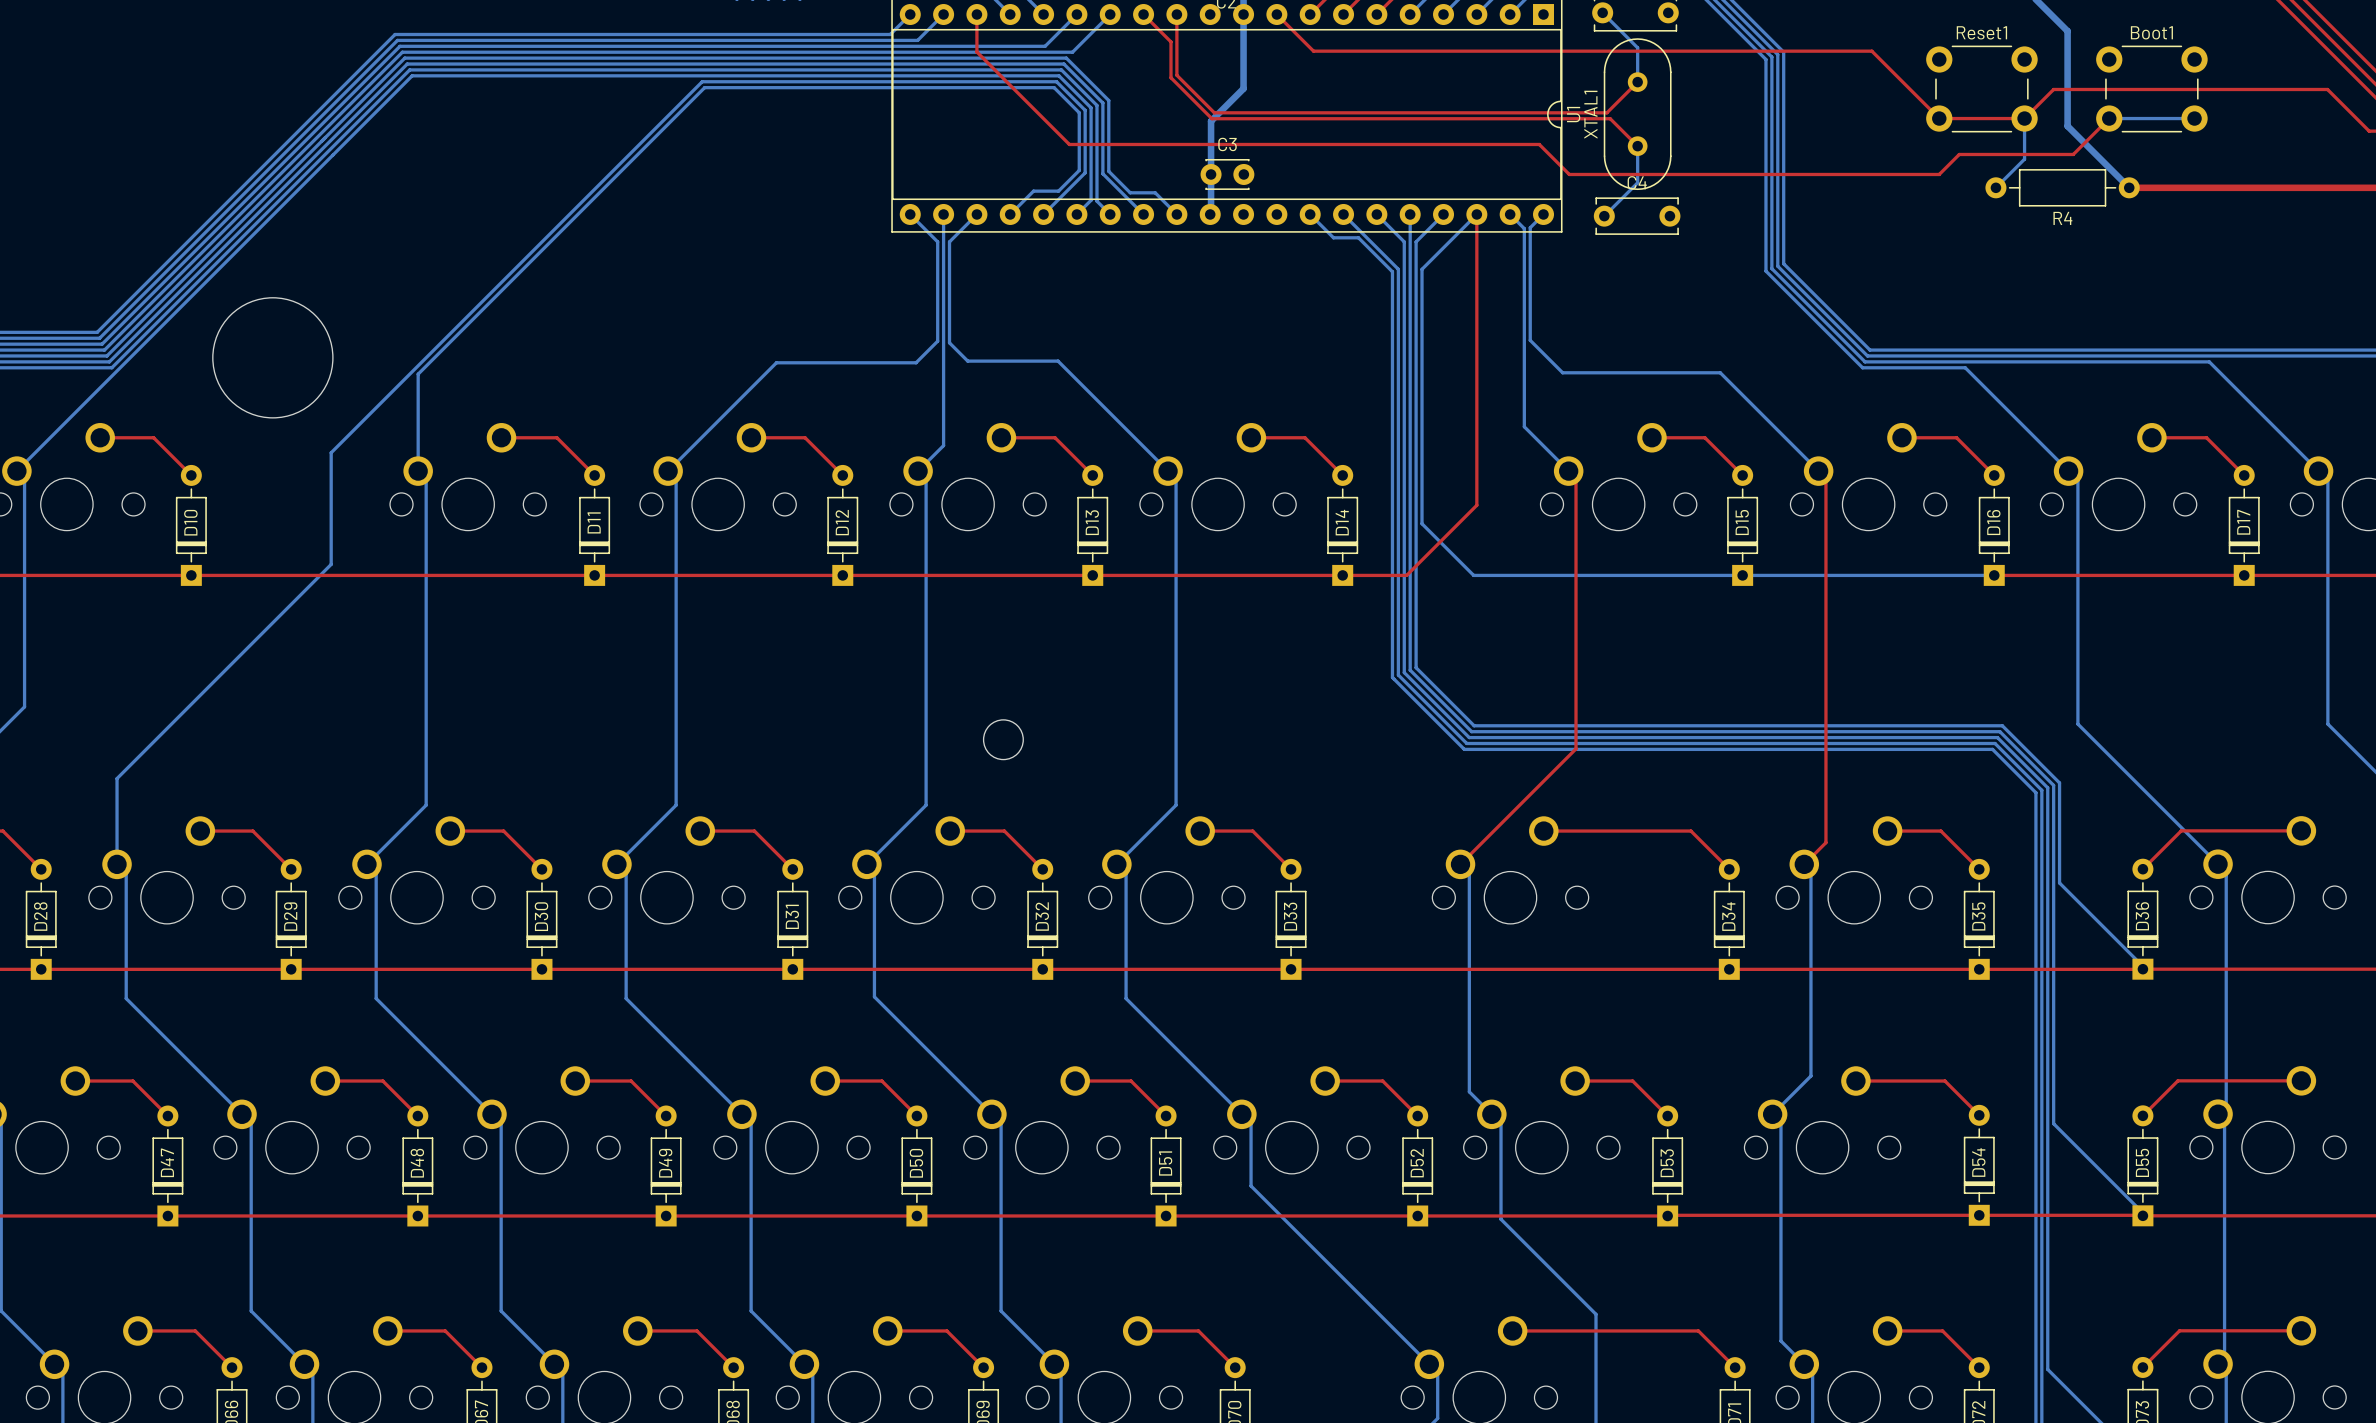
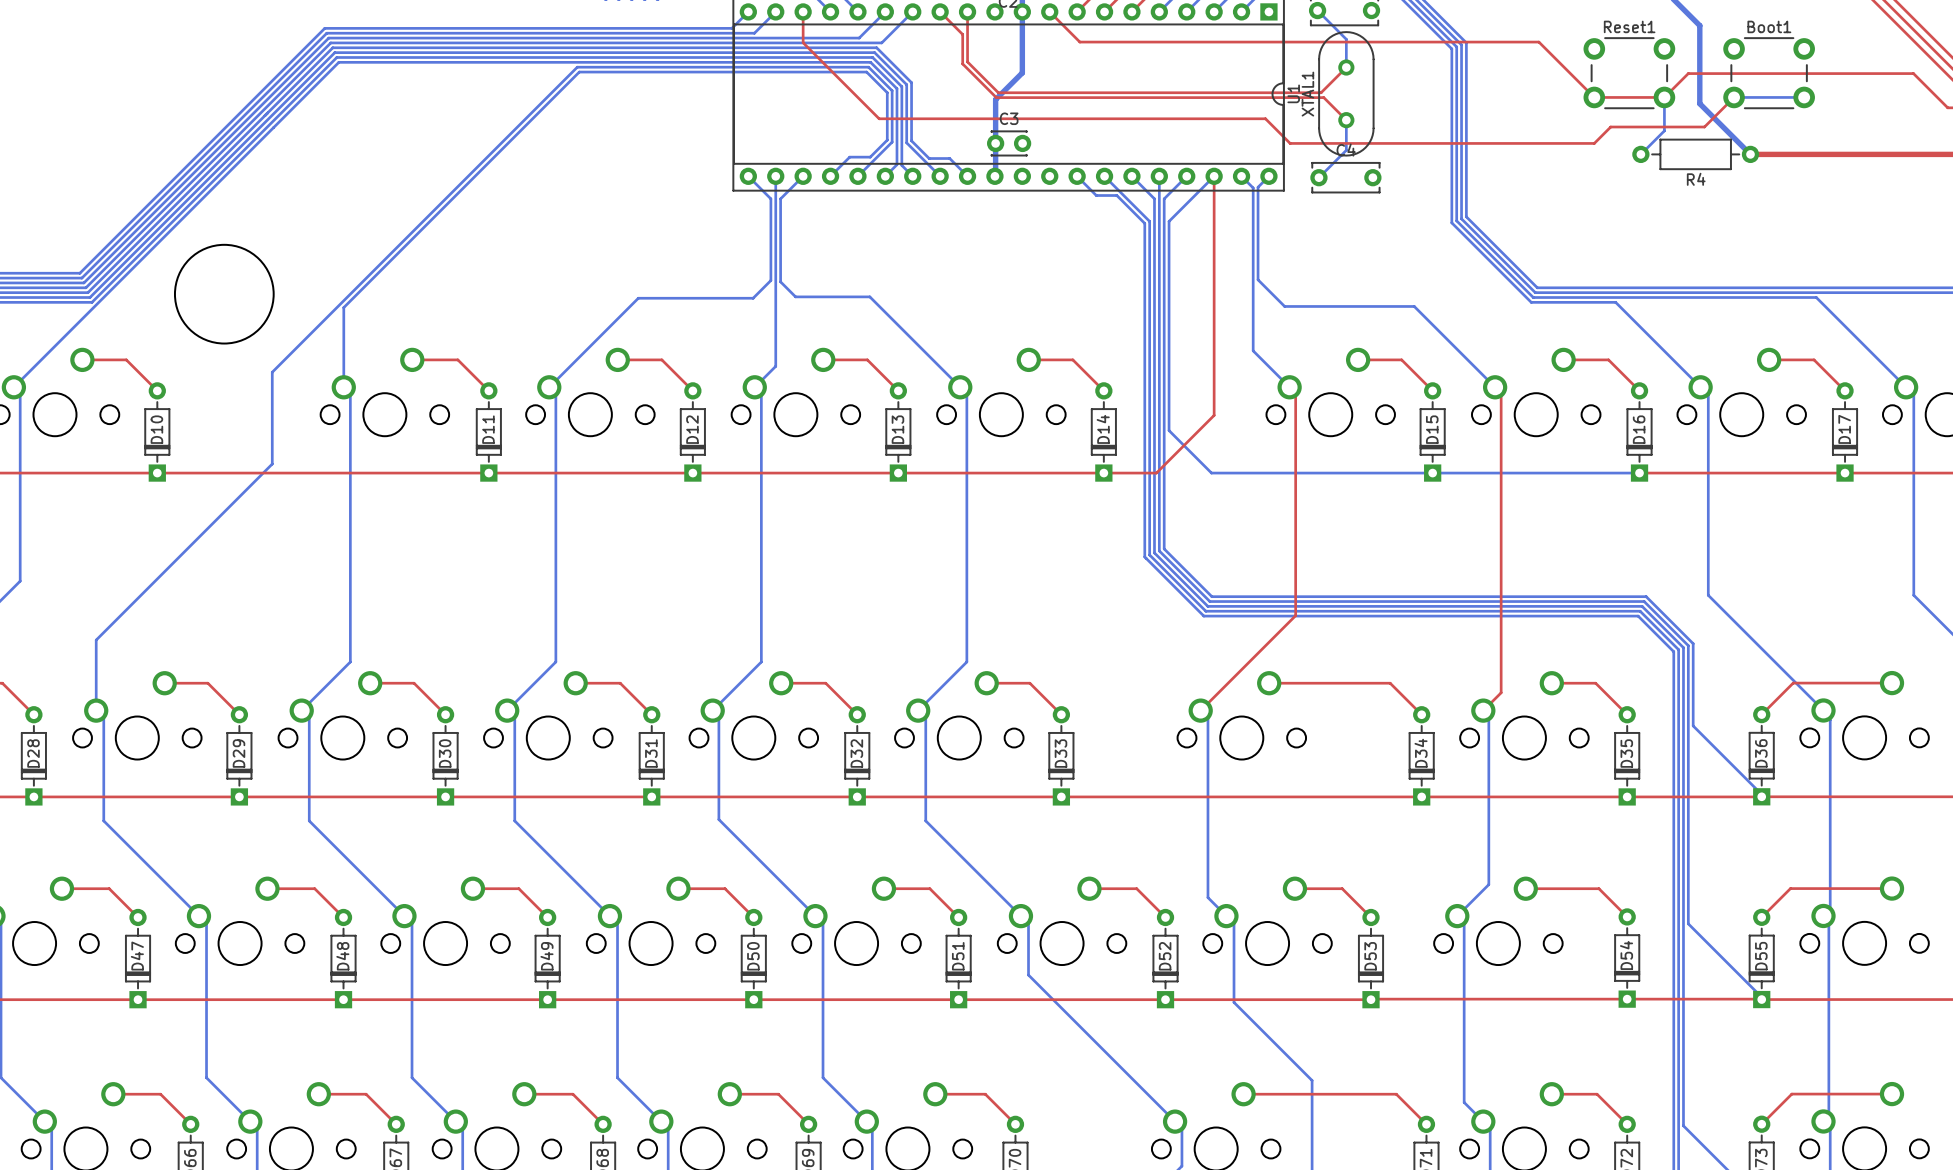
round board edge: [982, 719, 1024, 761] -> none

